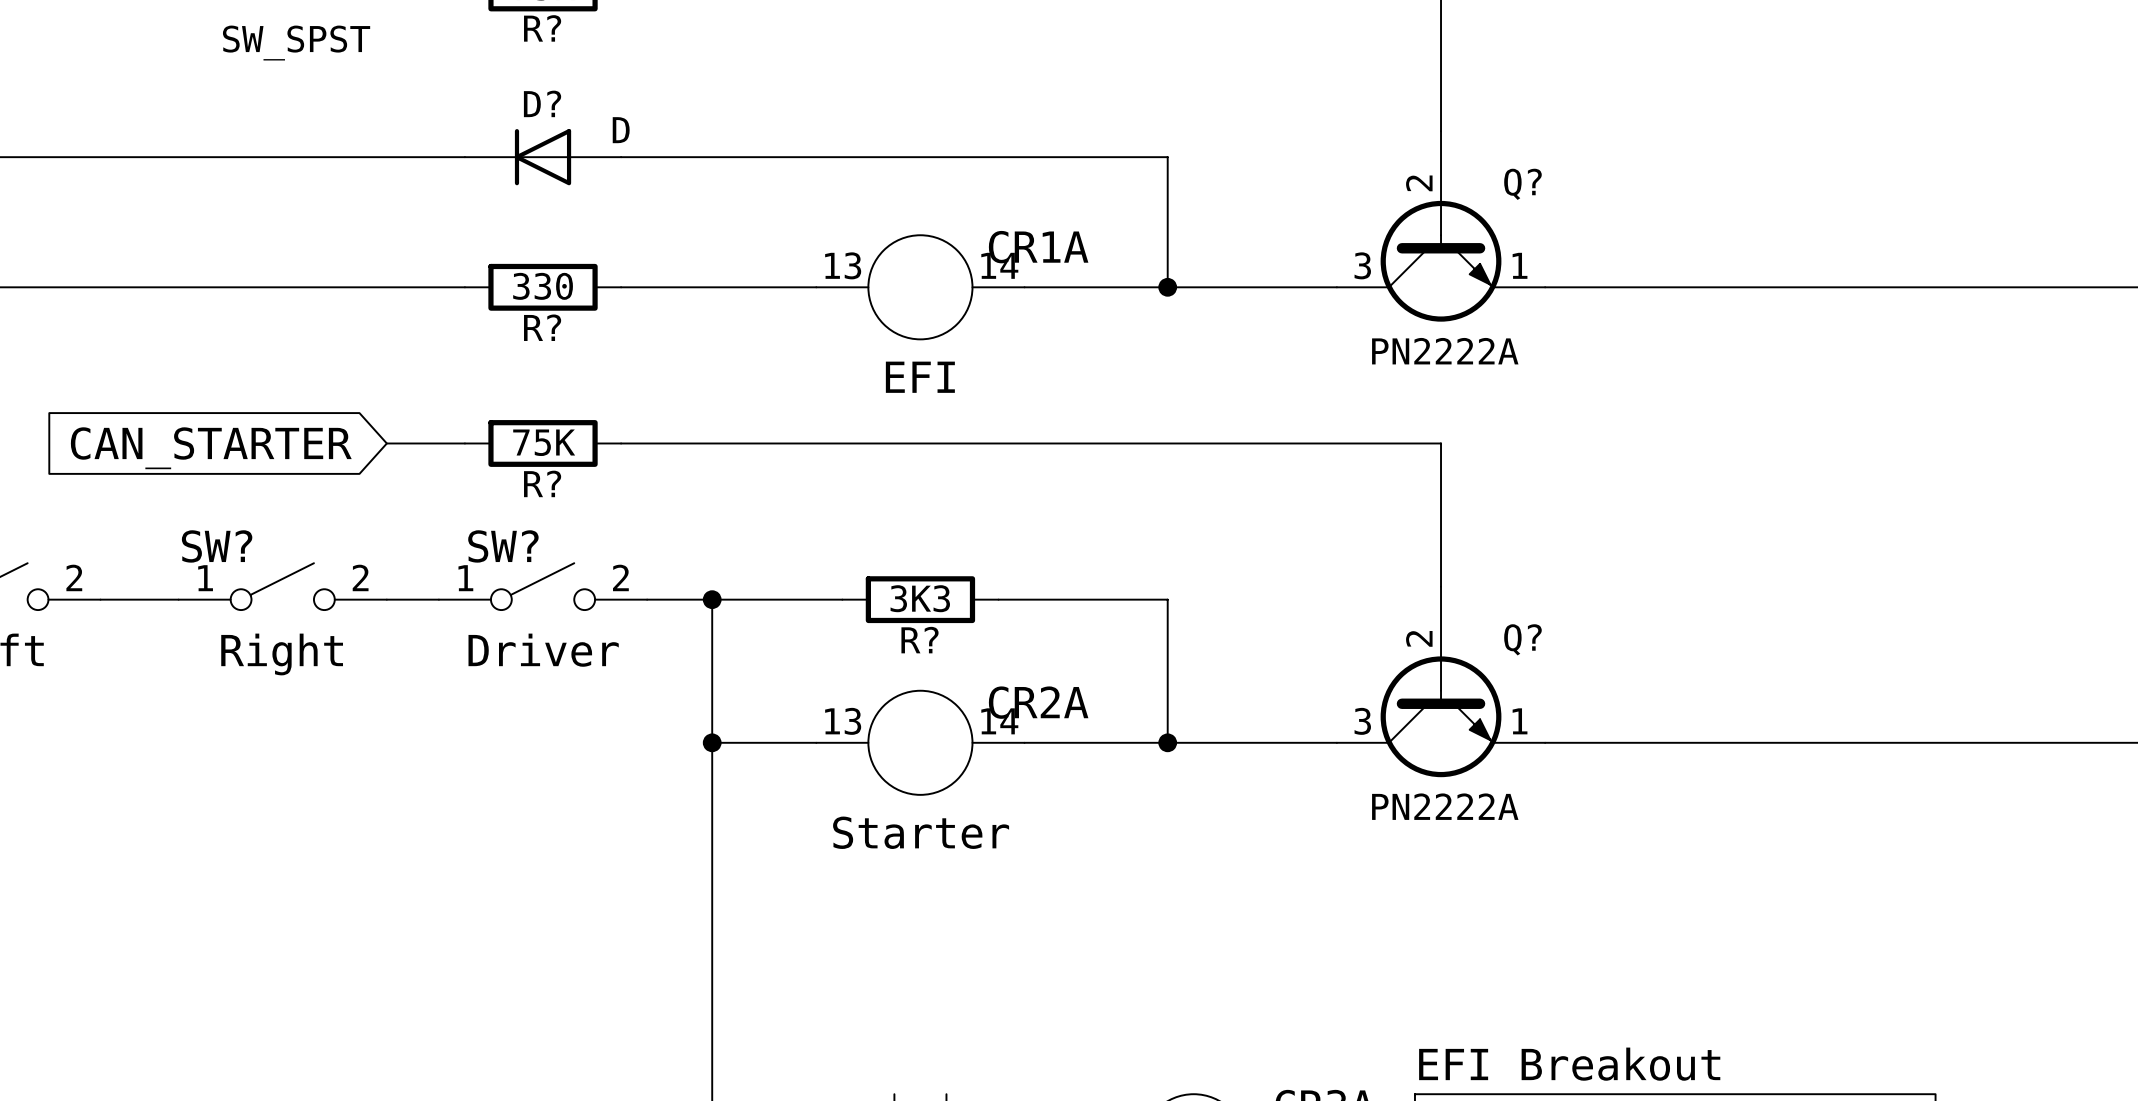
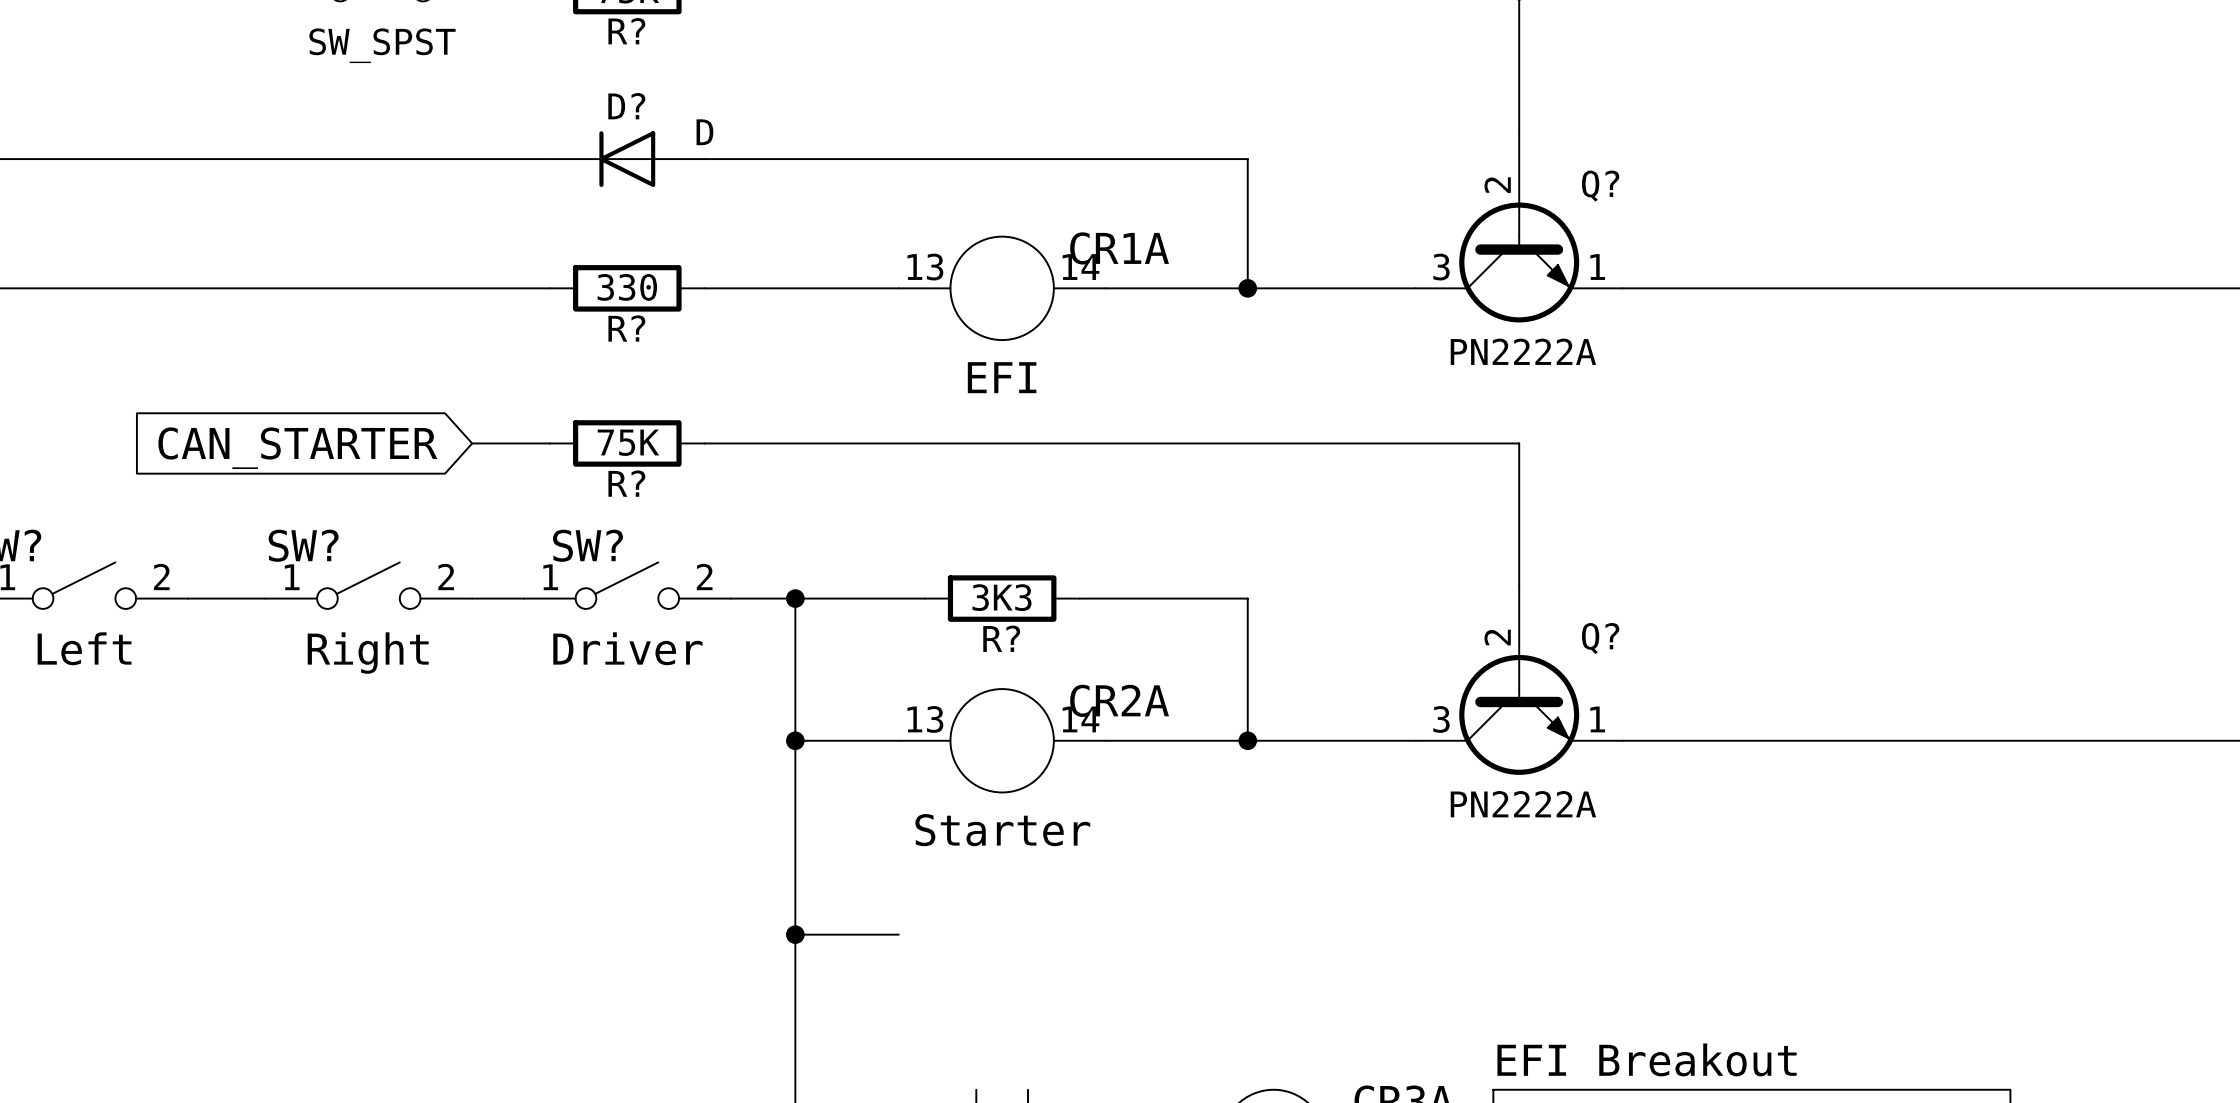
wire: none -> (795, 934) (898, 934)
junction: none -> (795, 934)

